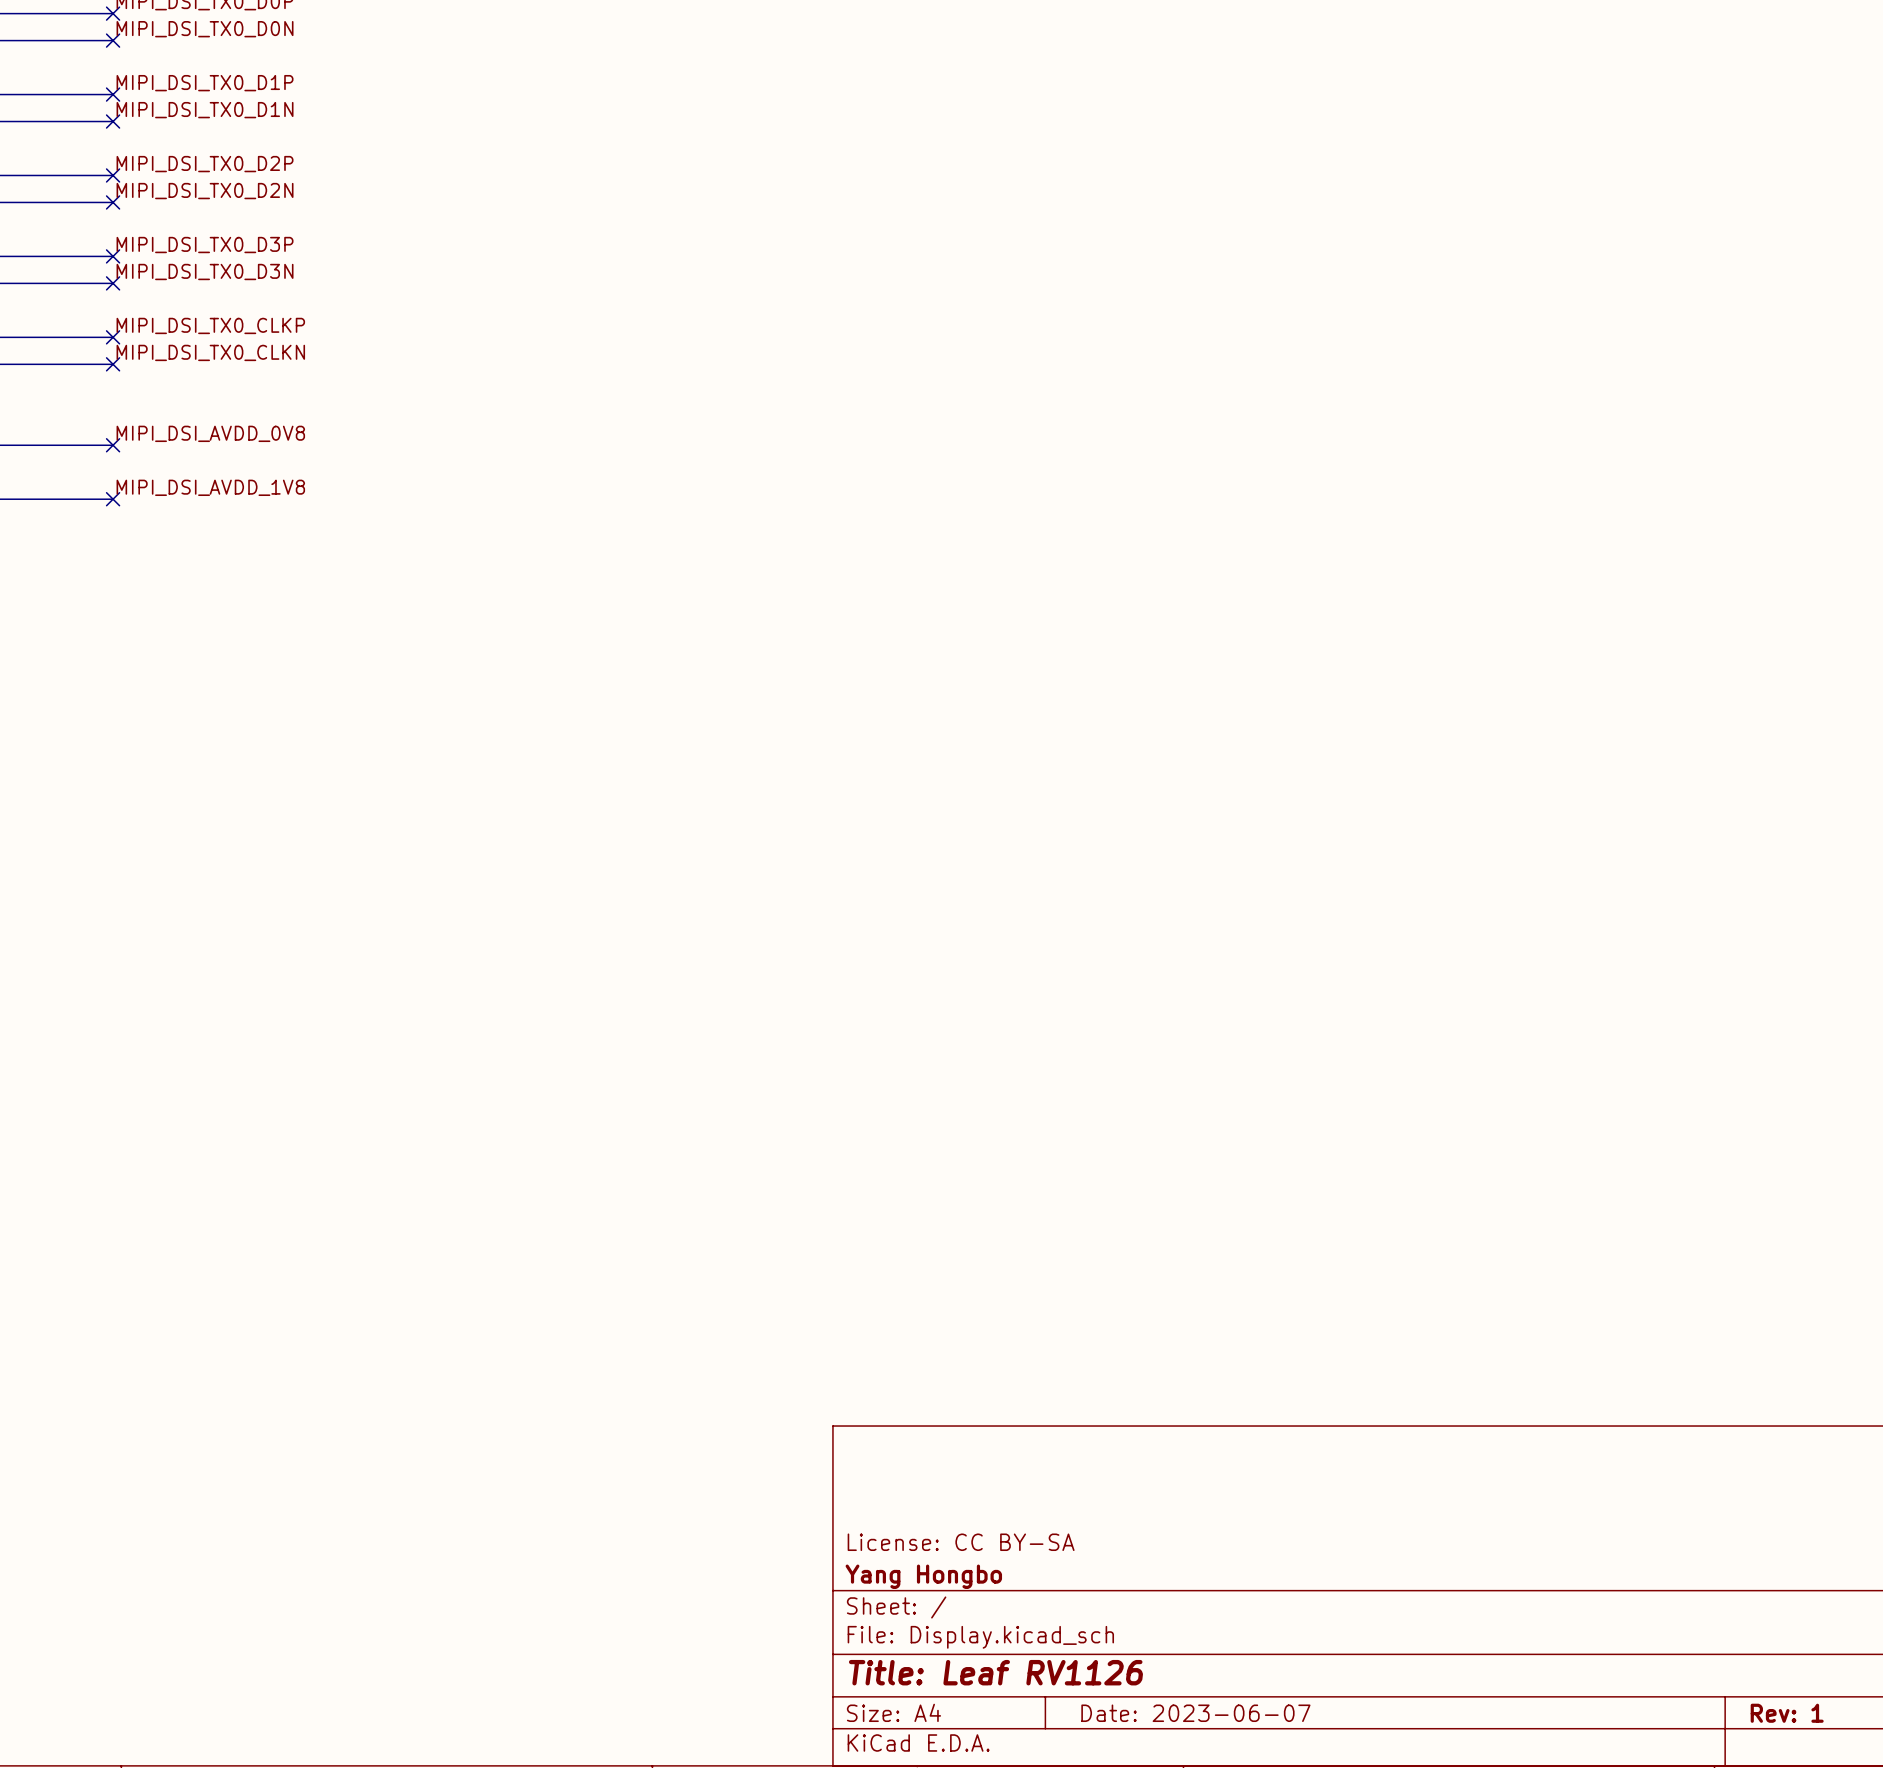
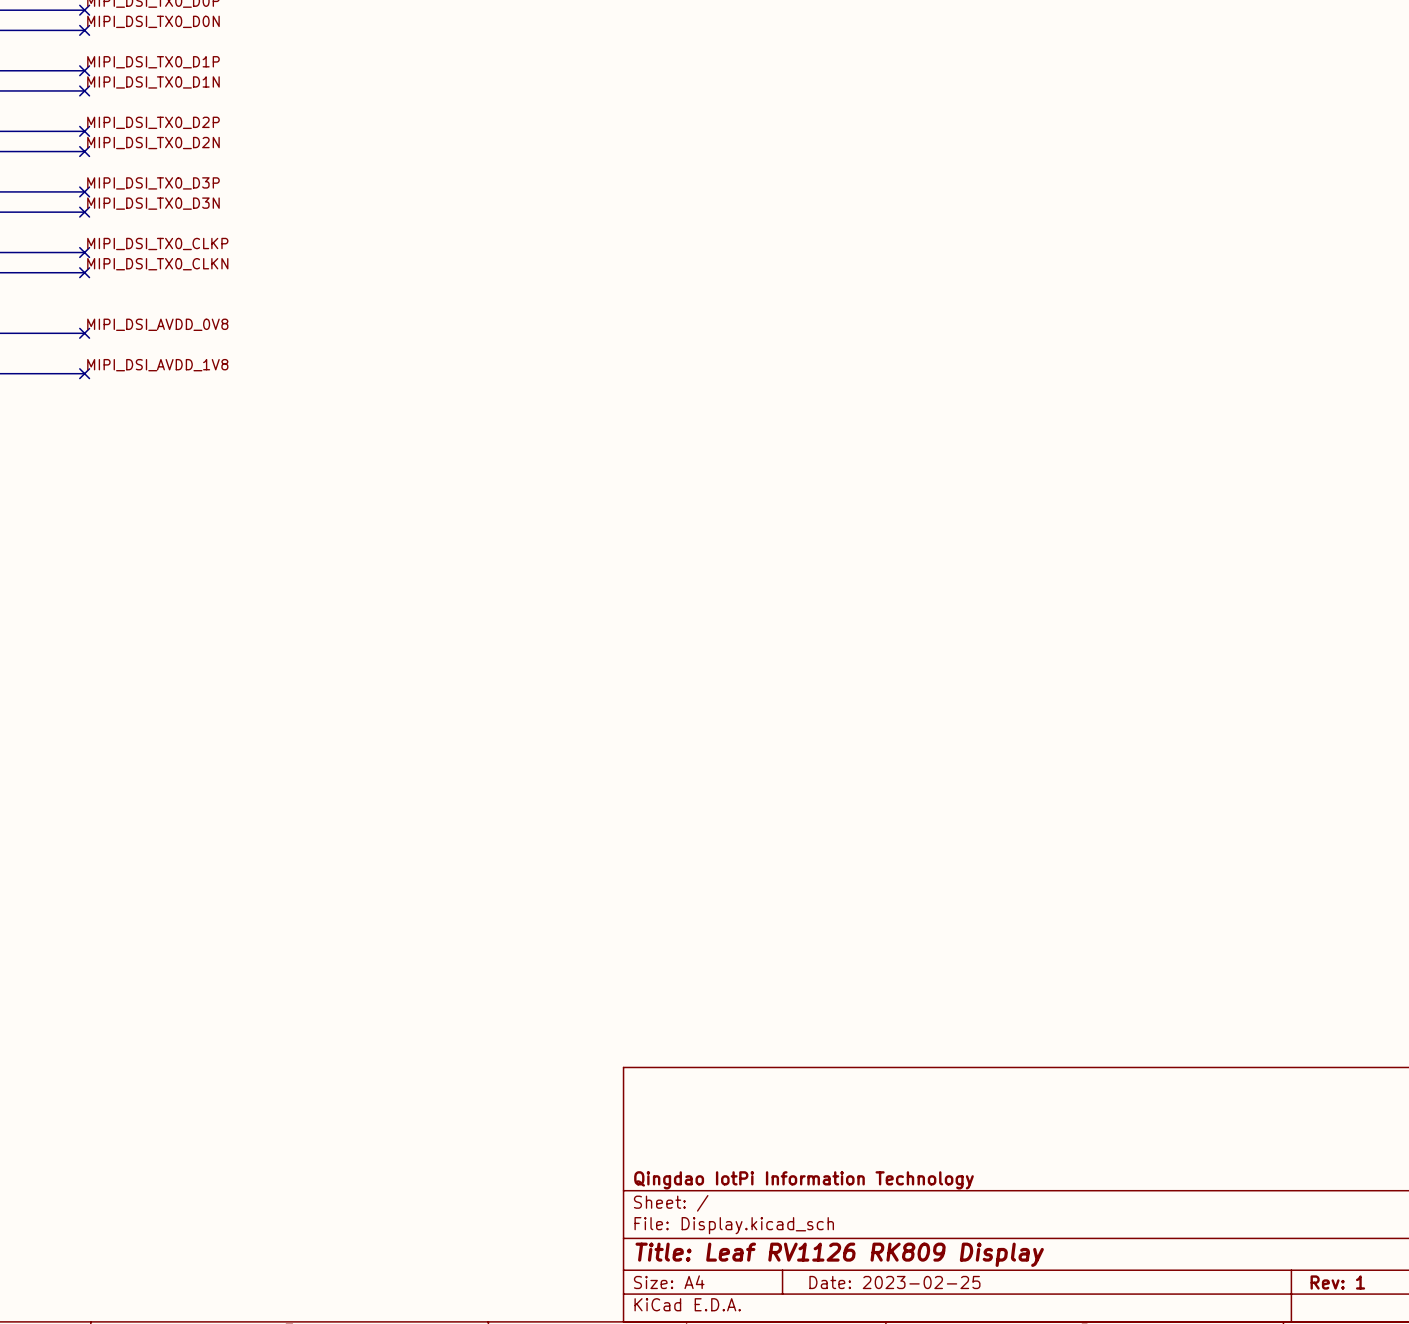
title block: License: CC BY-SA (961, 1542) -> none
title block: Yang Hongbo (923, 1576) -> Qingdao IotPi Information Technology (803, 1180)
title block: Title: Leaf RV1126 (995, 1672) -> Title: Leaf RV1126 RK809 Display (839, 1254)
title block: Date: 2023-06-07 (1195, 1713) -> Date: 2023-02-25 (894, 1282)

